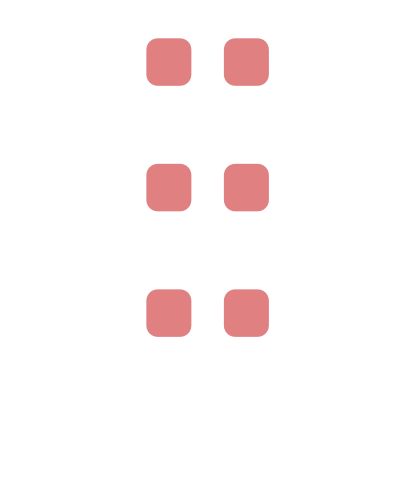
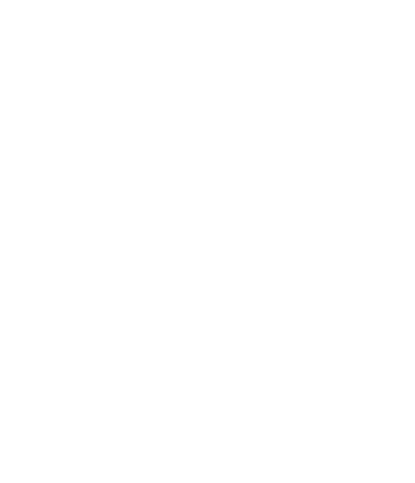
part: (207, 62) -> none
part: (207, 187) -> none
part: (207, 313) -> none

